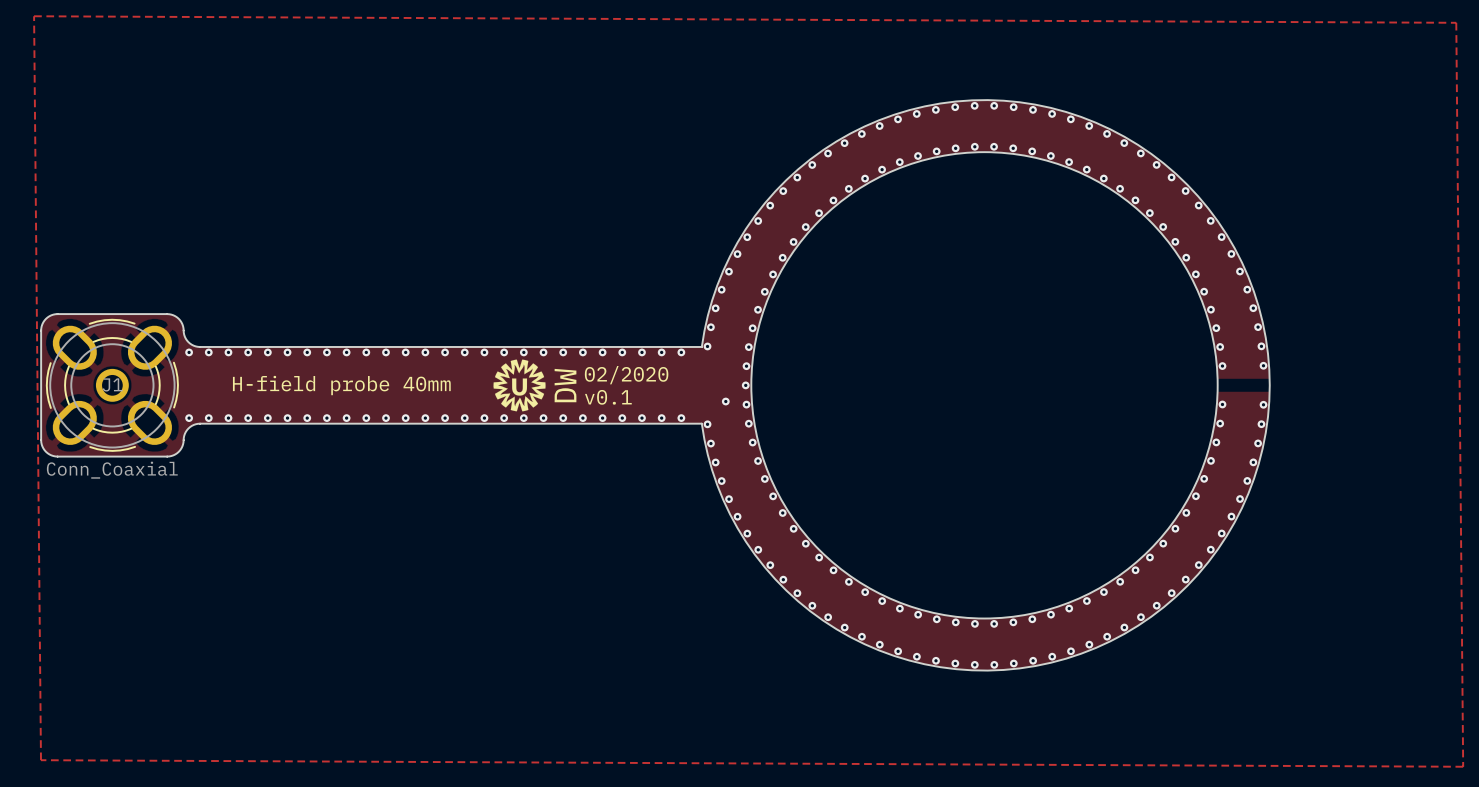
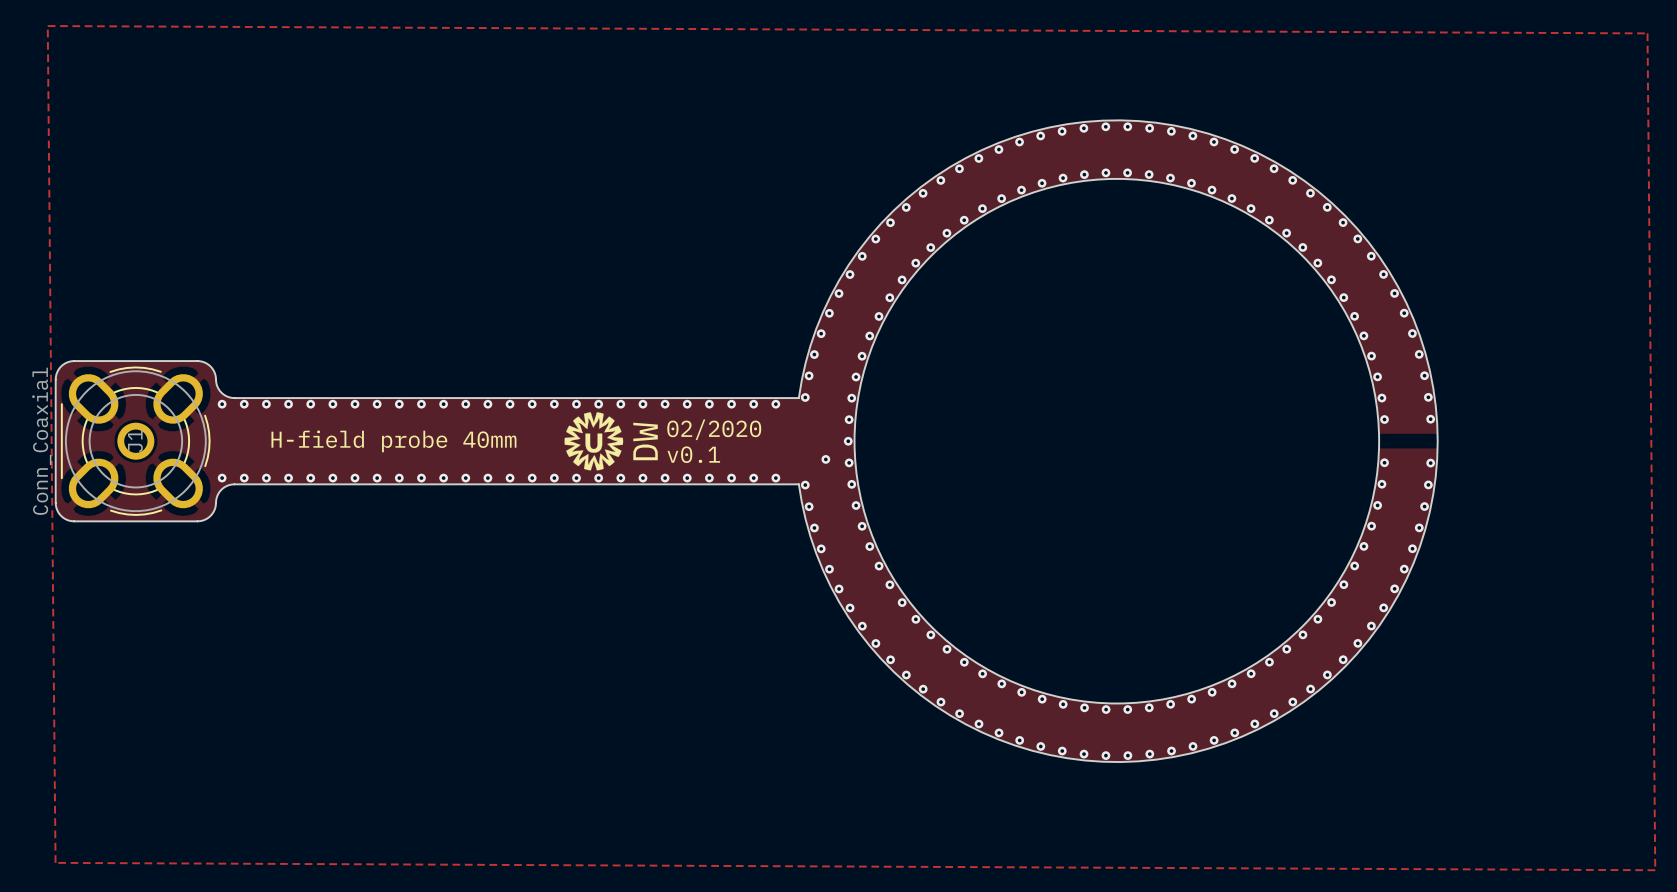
J1 footprint: [46, 318, 179, 452] -> [60, 366, 211, 516]
J1 name rotation: 0° (112, 384) -> 90° counterclockwise (135, 440)
J1 value rotation: 0° (112, 470) -> 90° counterclockwise (41, 441)

